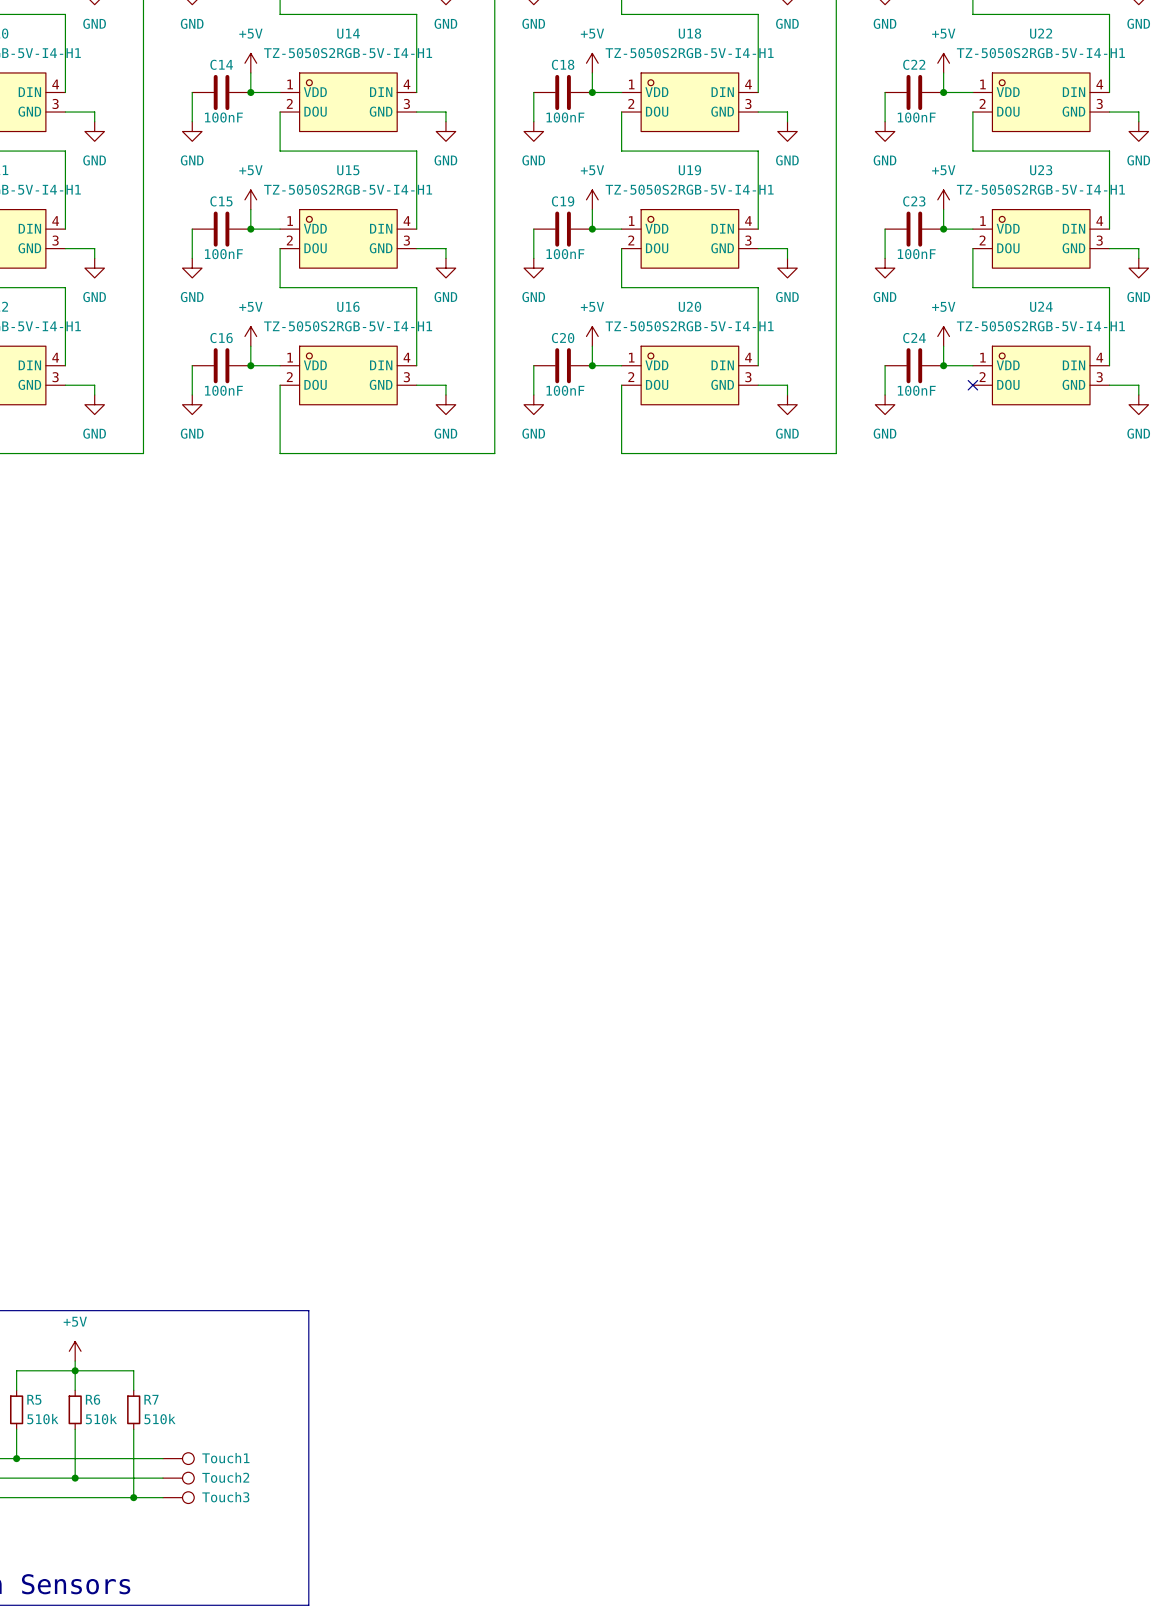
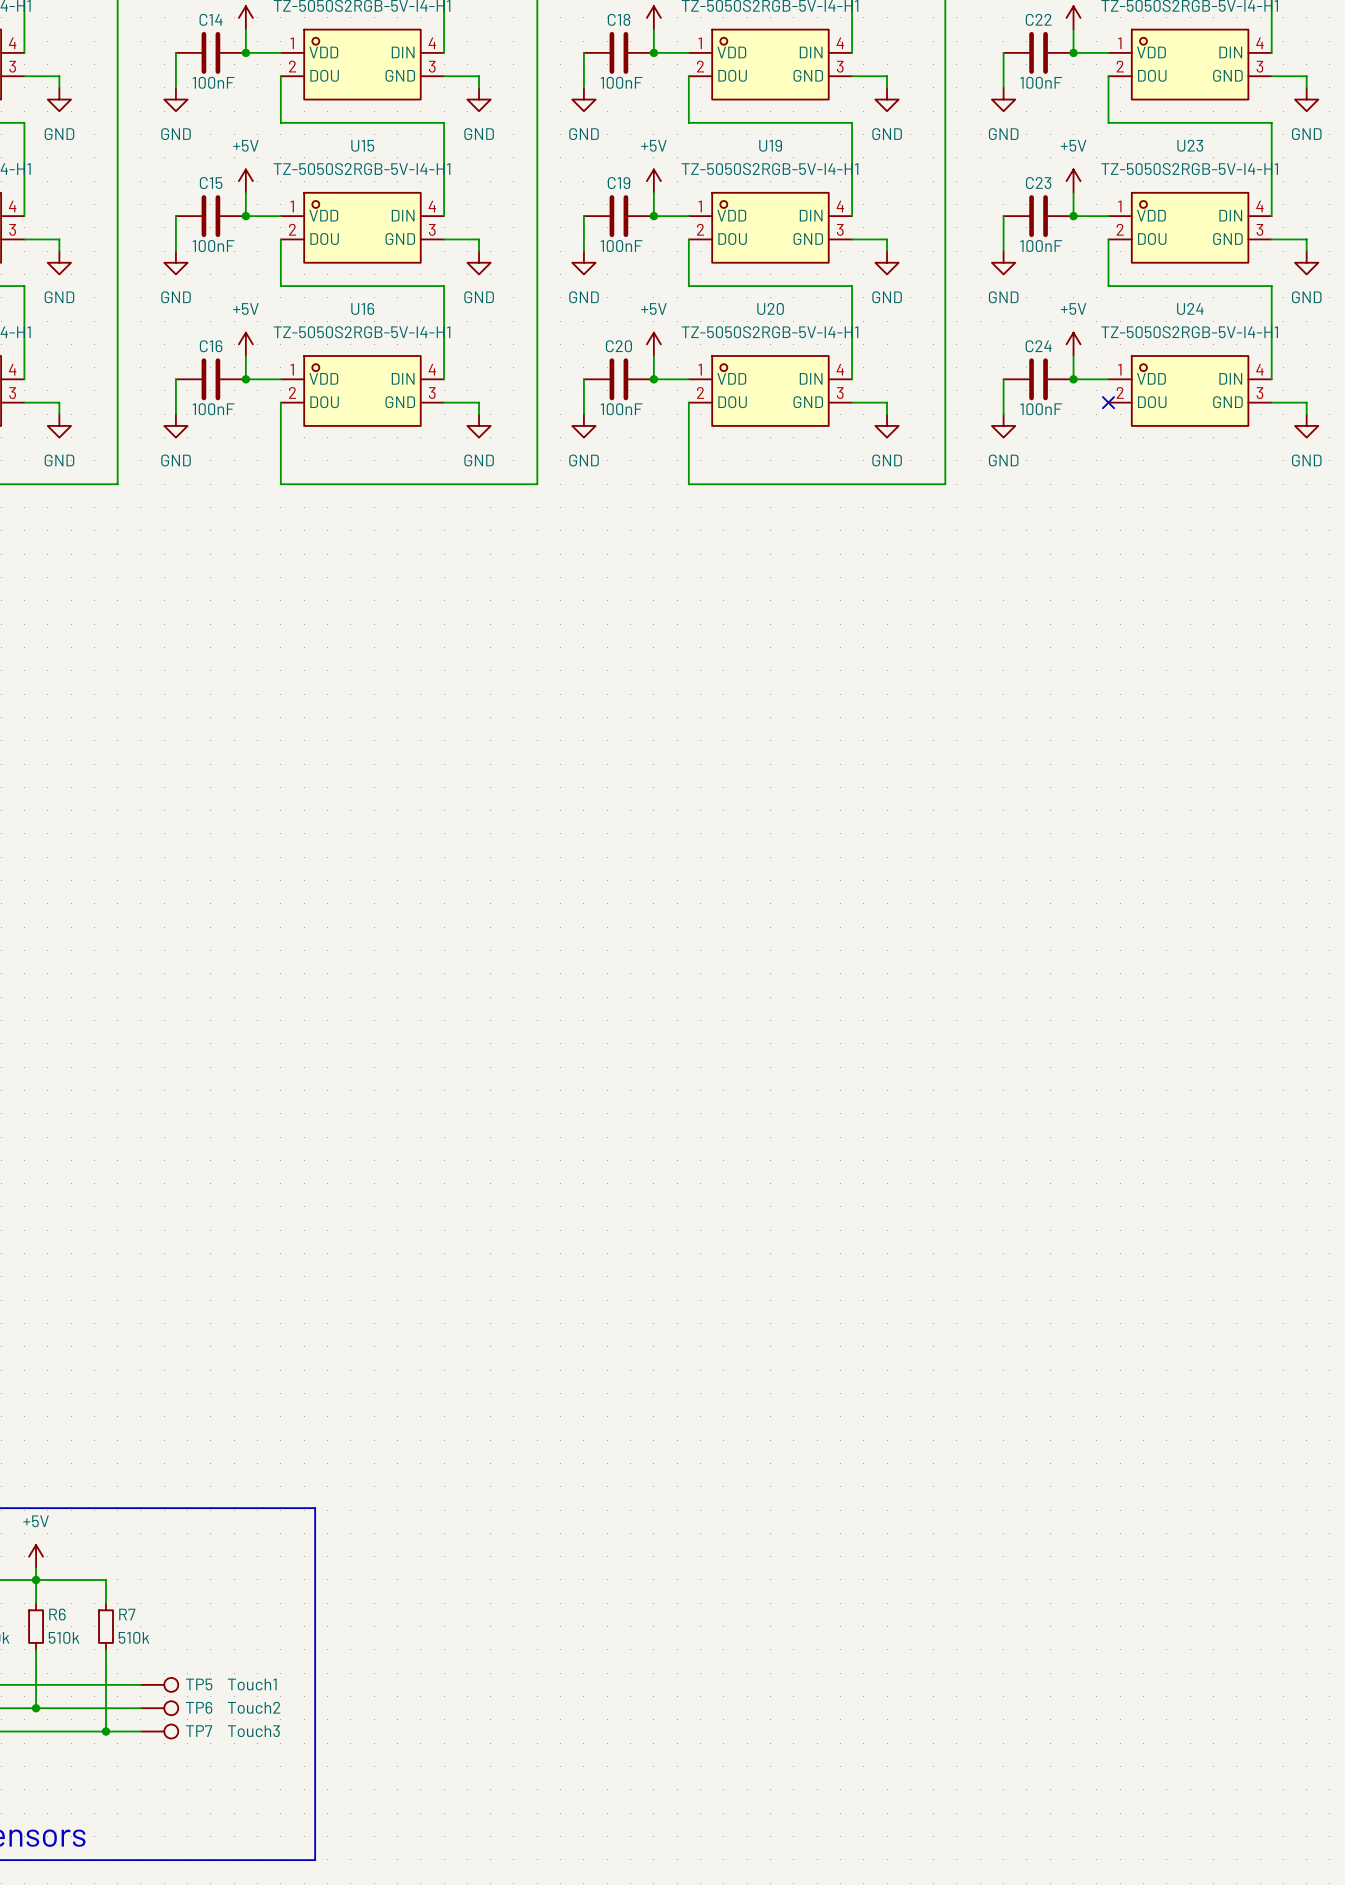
TP5 name: none -> TP5 (199, 1684)
TP5 value position: Touch1 (225, 1458) -> Touch1 (252, 1684)
TP6 name: none -> TP6 (199, 1707)
TP6 value position: Touch2 (225, 1477) -> Touch2 (254, 1707)
TP7 name: none -> TP7 (199, 1731)
TP7 value position: Touch3 (225, 1497) -> Touch3 (253, 1731)

